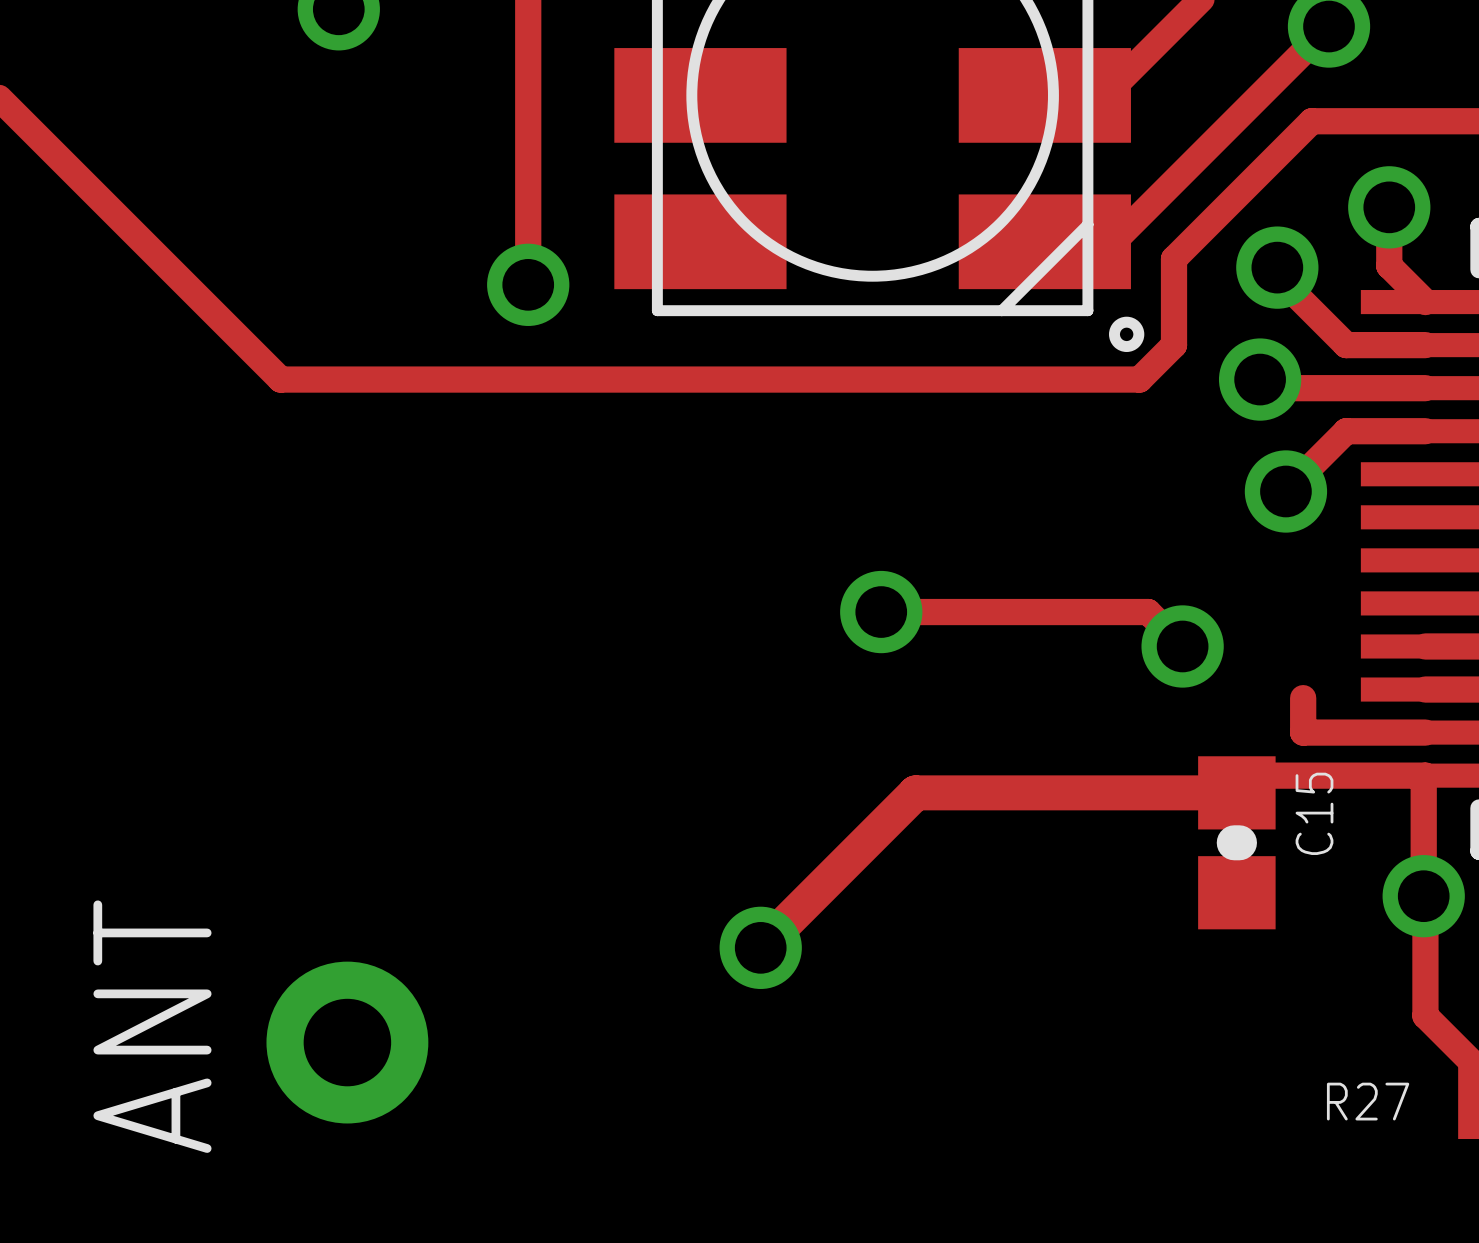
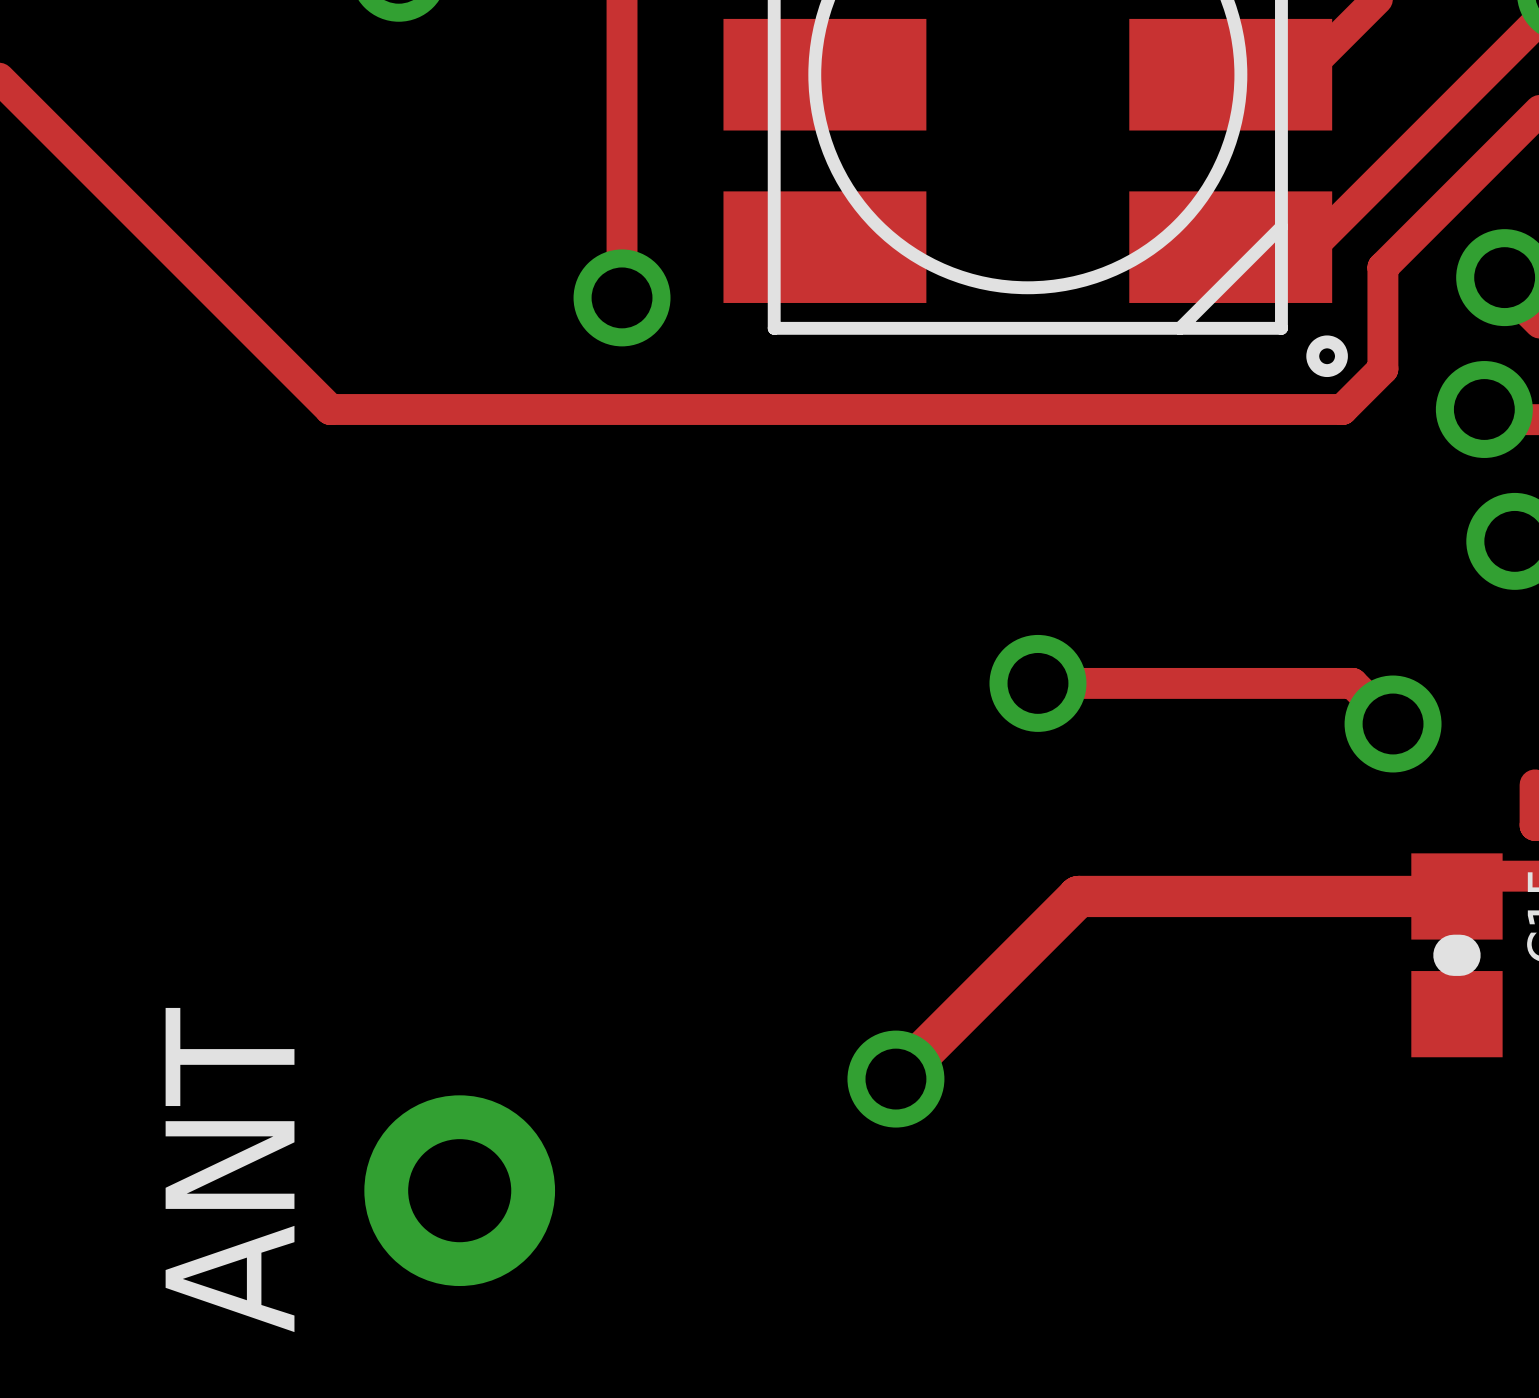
ANT position: (347, 1042) -> (459, 1190)

